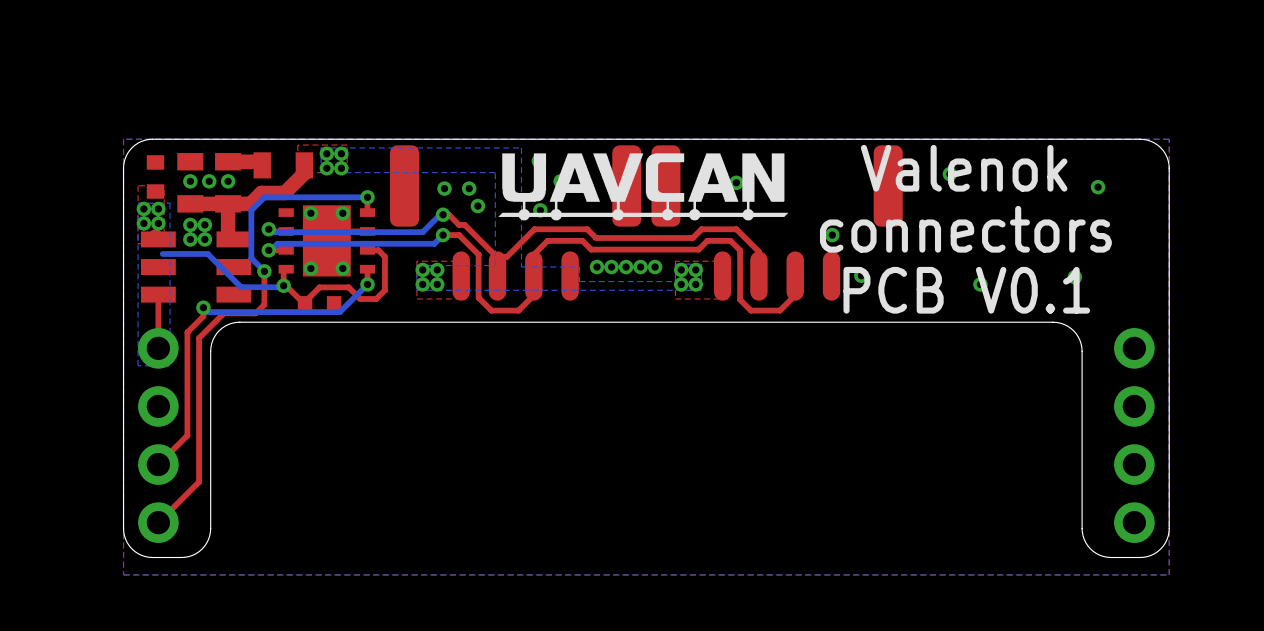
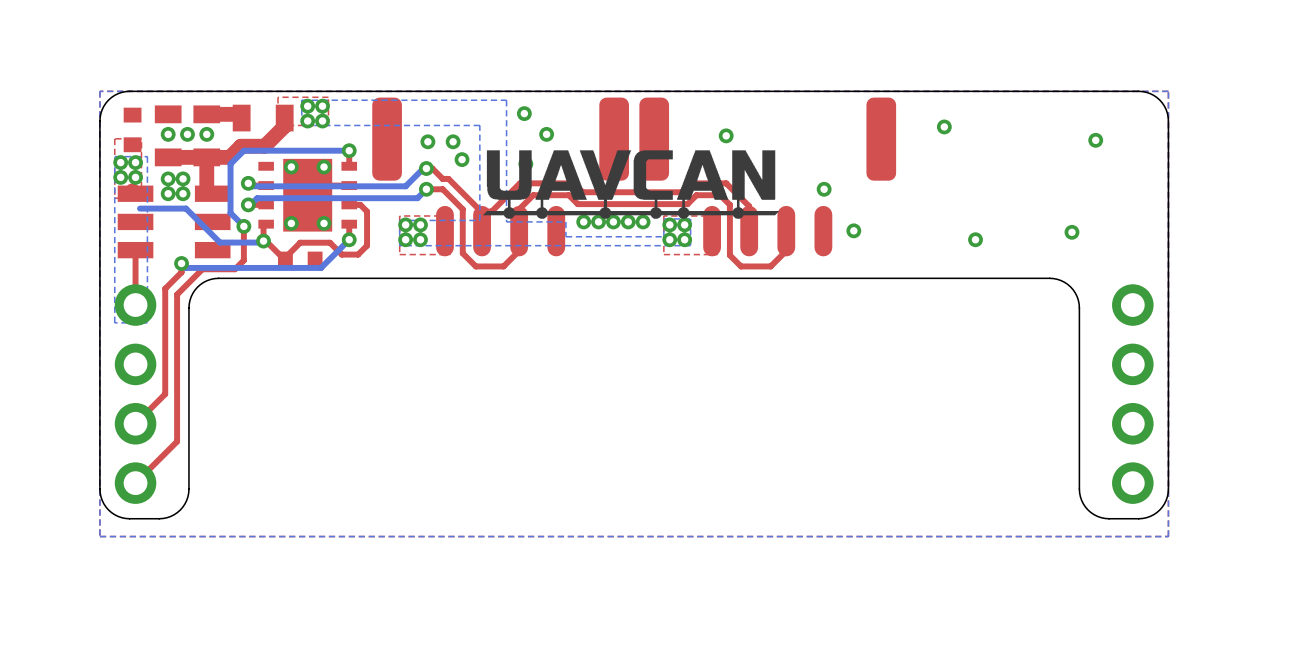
text: Valenok (964, 168) -> none
drawing position: (643, 186) -> (631, 184)
text: connectors (965, 229) -> none
text: PCB V0.1 (966, 290) -> none

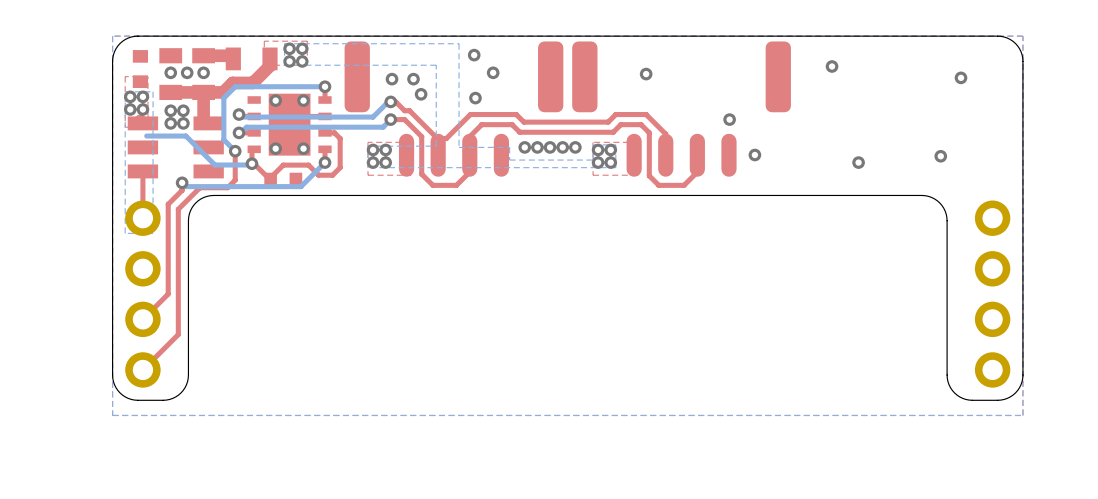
drawing: [483, 150, 780, 219] -> none

